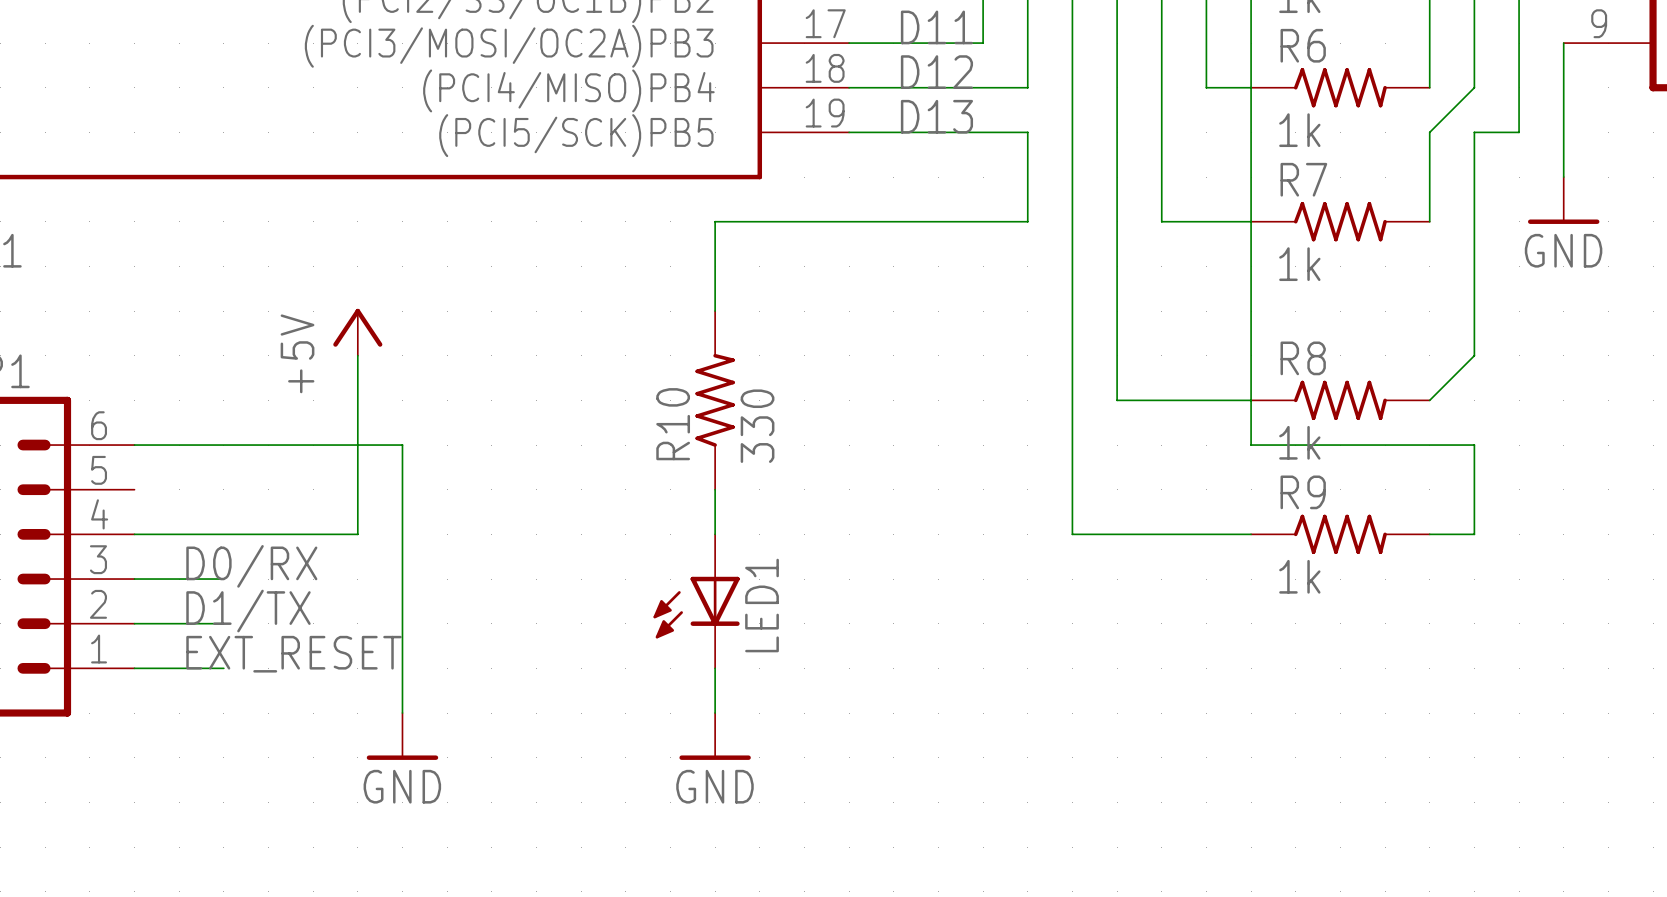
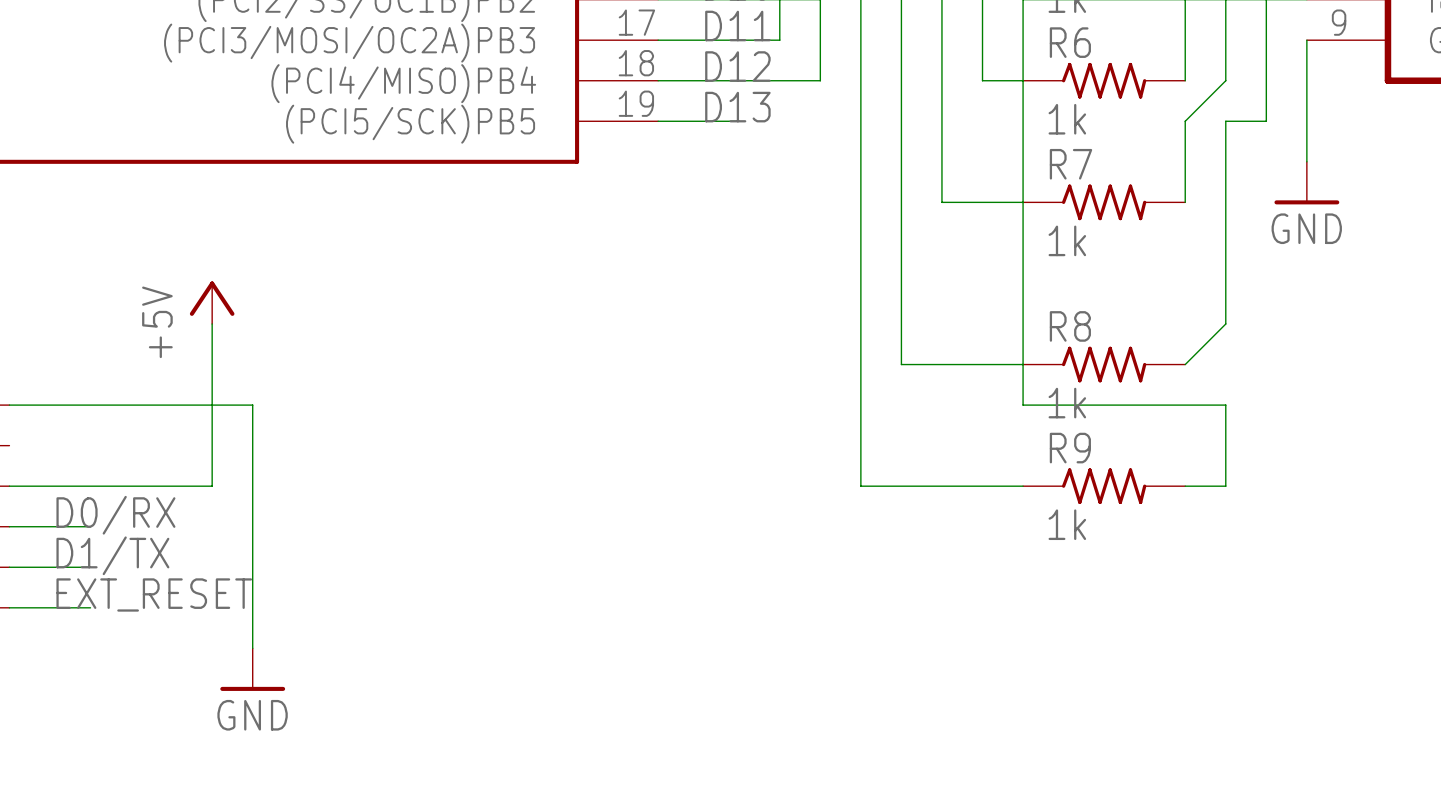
wire: (938, 132) (1027, 132) (1027, 221) (715, 221) (715, 311) -> none
R10: 330 (715, 400) -> none
wire: (715, 489) (715, 534) -> none
LED1: (696, 601) -> none
wire: (715, 668) (715, 713) -> none
power symbol: GND (715, 736) -> none

